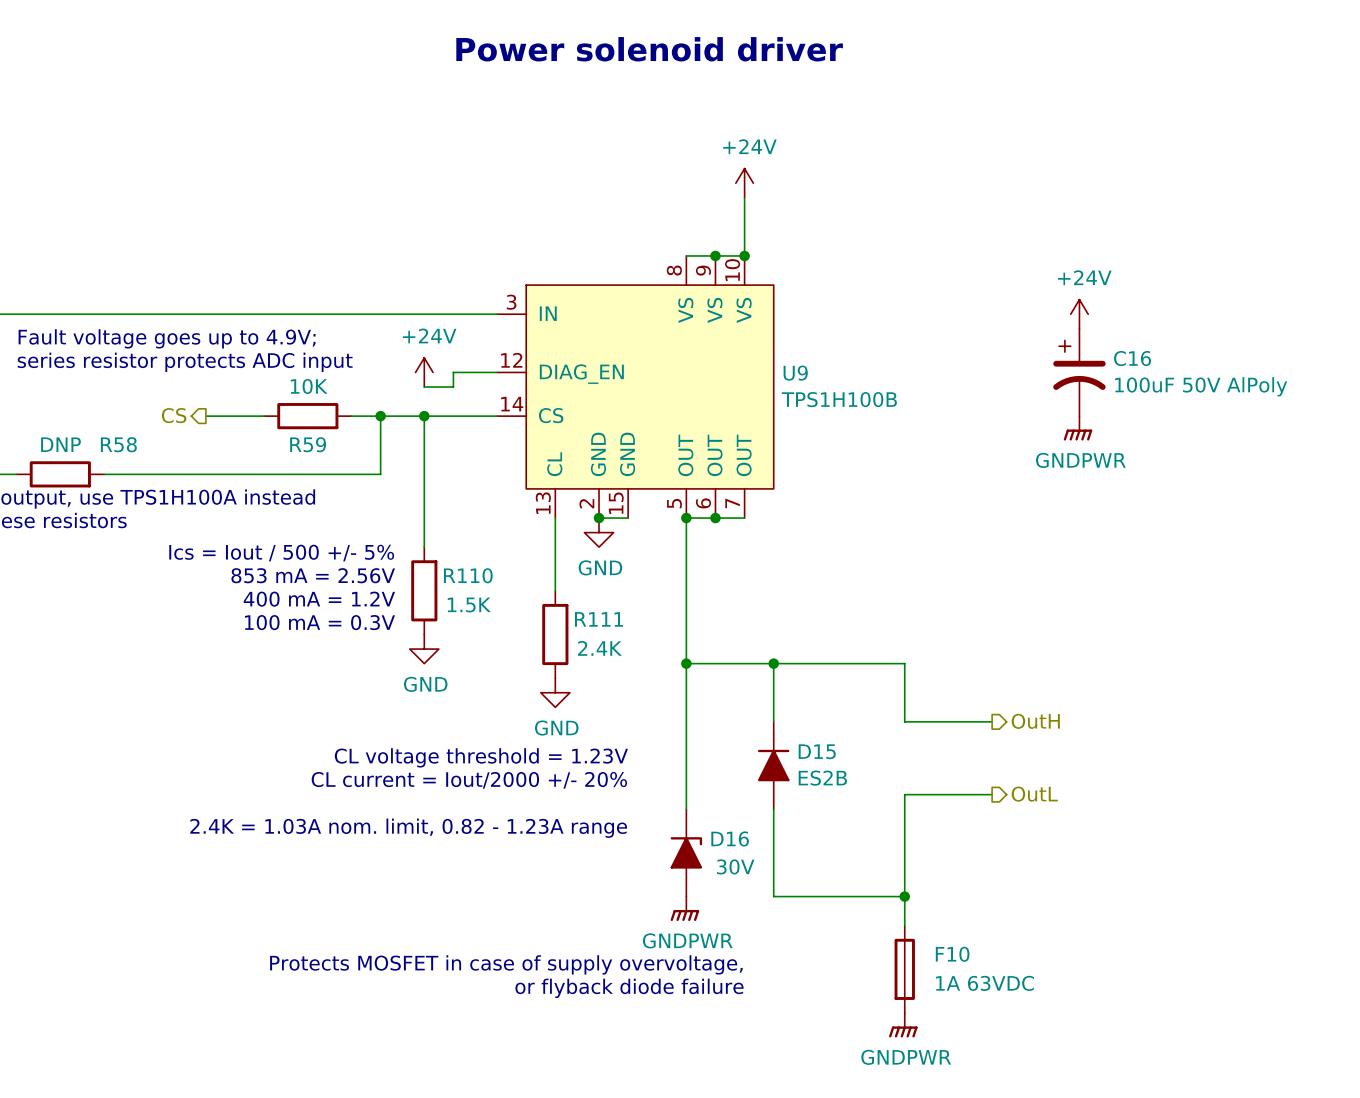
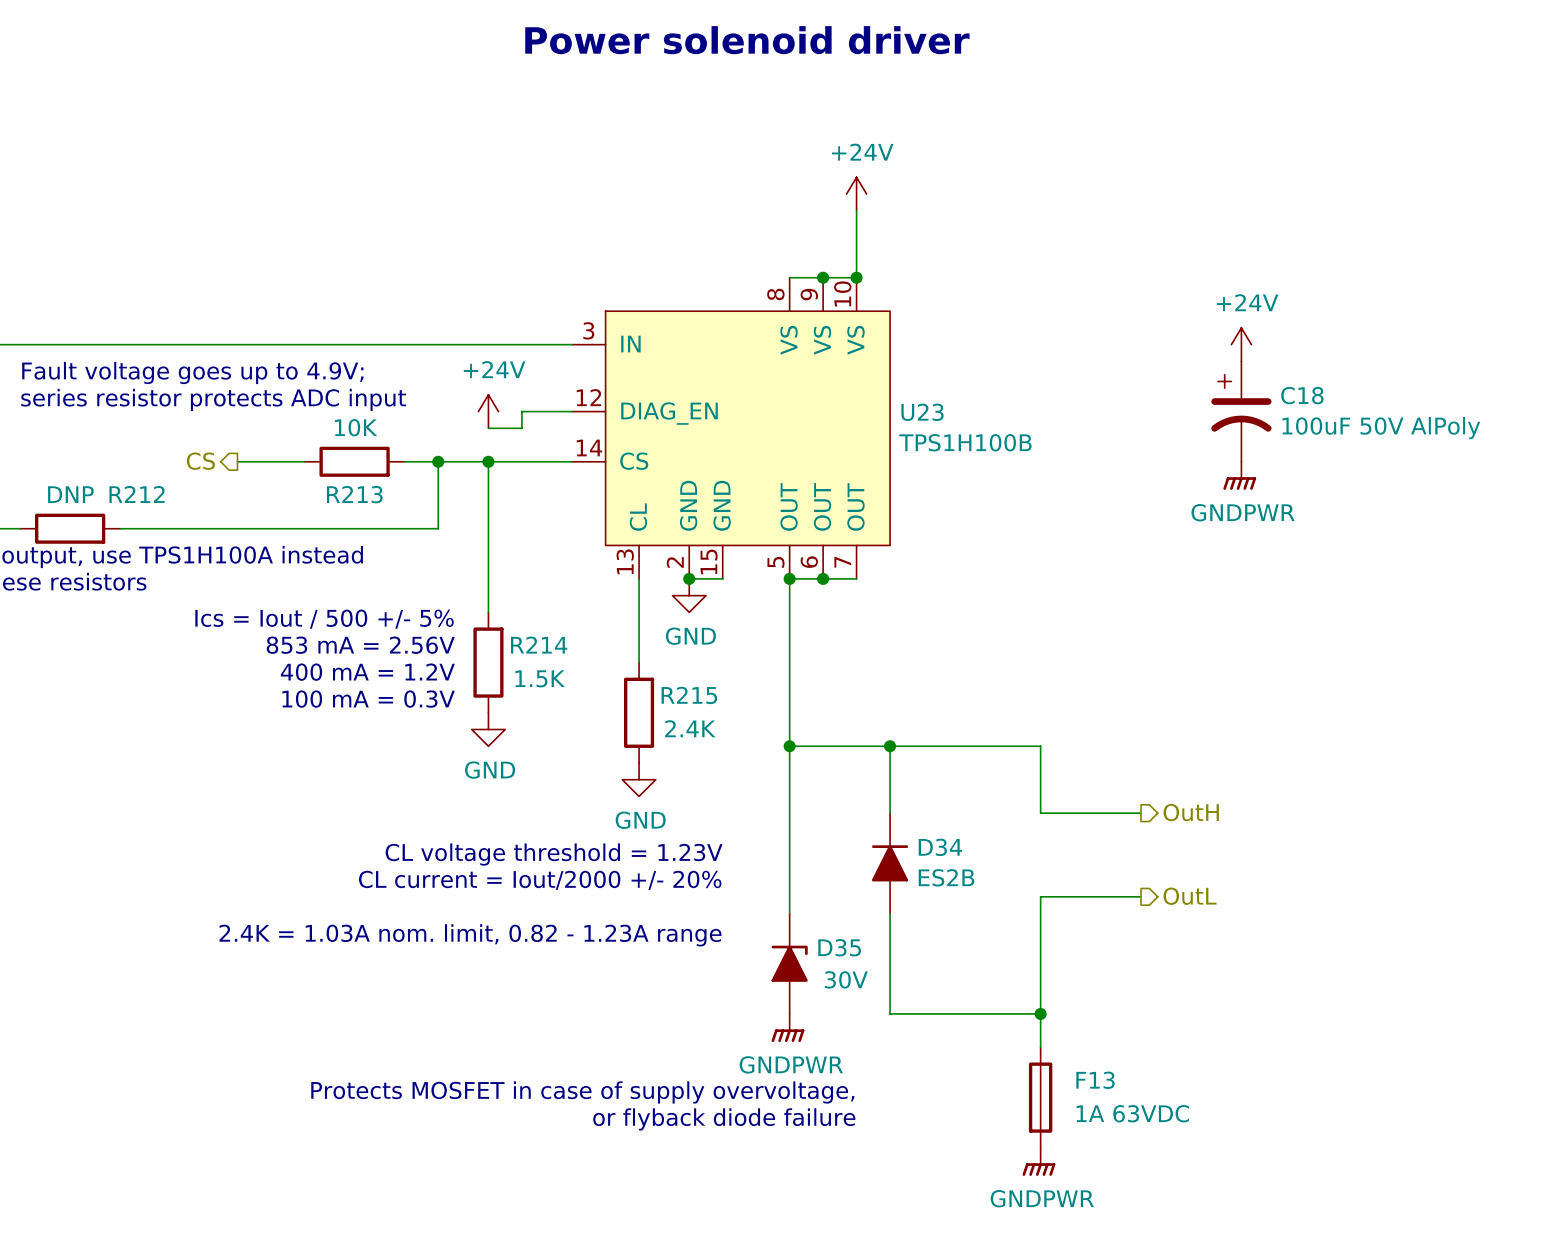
C16 name: C16 (1132, 358) -> C18 (1302, 395)
U9 name: U9 (795, 373) -> U23 (922, 412)
R58 name: R58 (118, 444) -> R212 (137, 494)
R59 name: R59 (308, 444) -> R213 (354, 494)
R110 name: R110 (468, 575) -> R214 (539, 645)
R111 name: R111 (599, 619) -> R215 (689, 695)
D15 name: D15 (817, 751) -> D34 (940, 847)
D16 name: D16 (730, 838) -> D35 (839, 947)
F10 name: F10 (952, 954) -> F13 (1095, 1080)

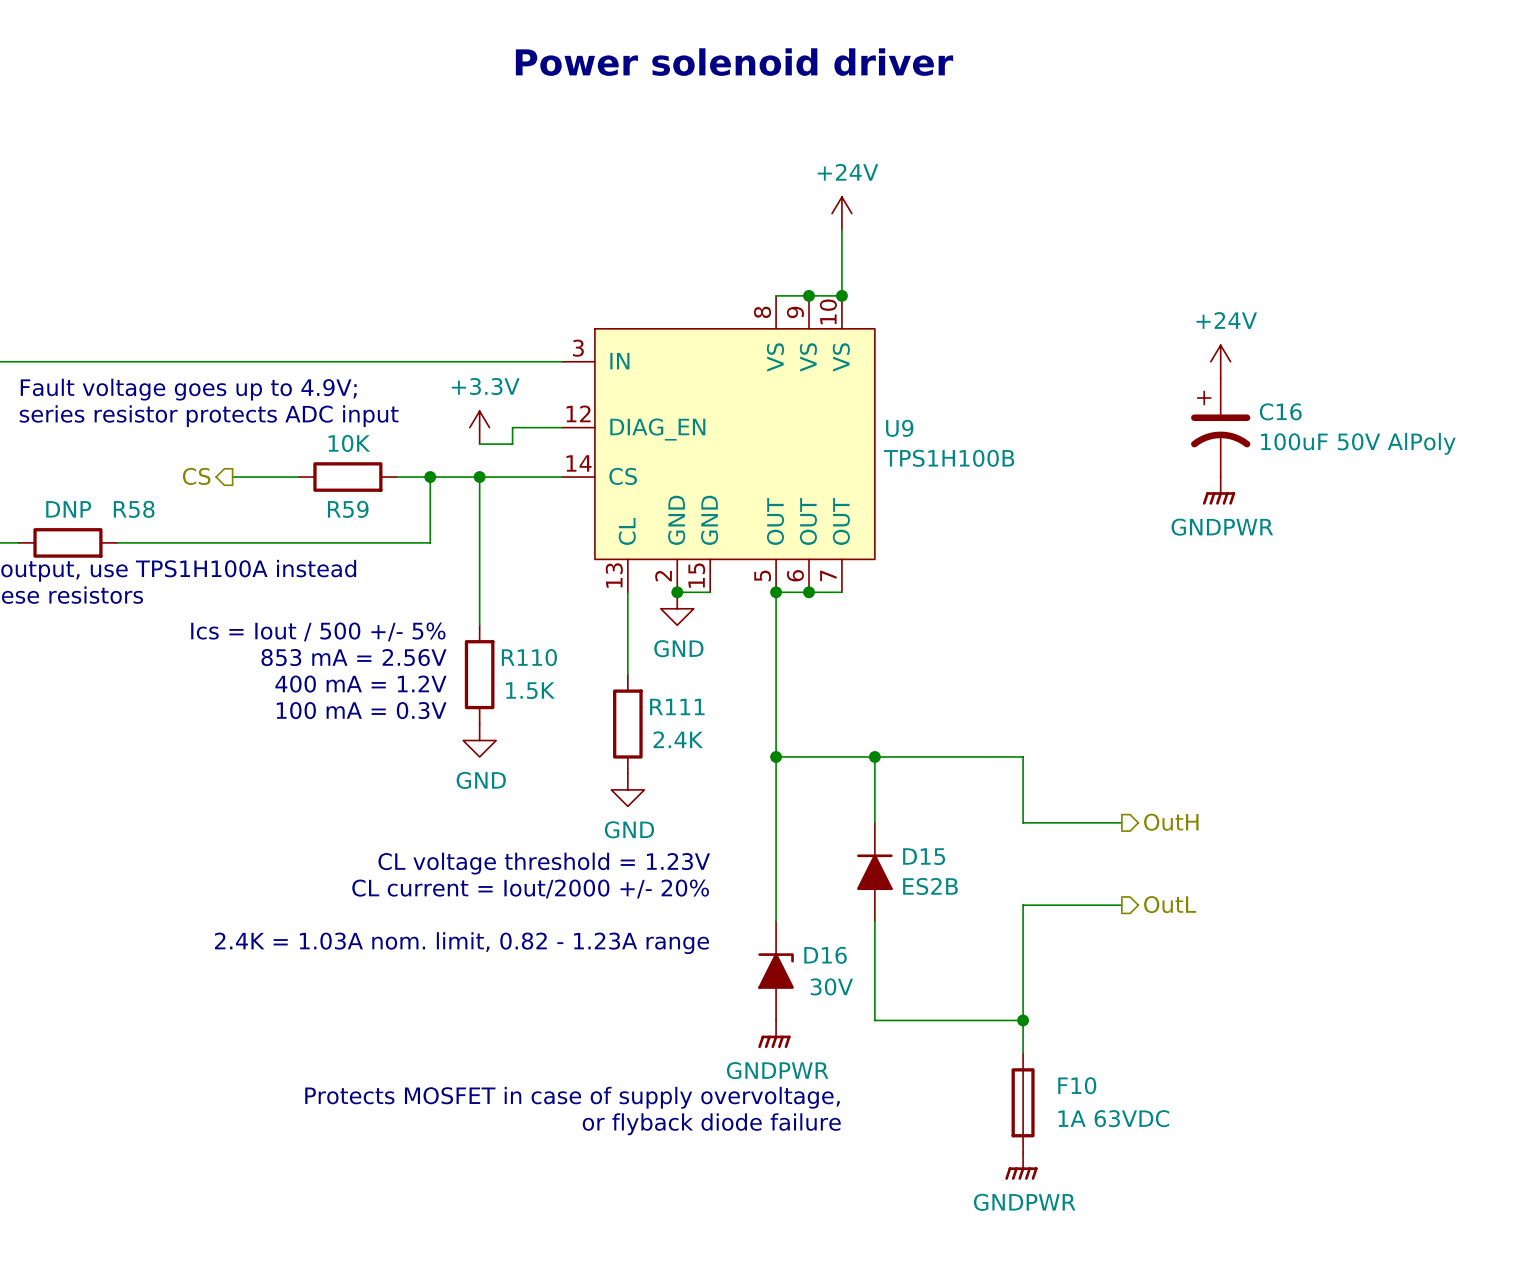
C18 name: C18 (1302, 395) -> C16 (1280, 411)
power symbol: +24V (488, 411) -> +3.3V (479, 427)
U23 name: U23 (922, 412) -> U9 (899, 428)
R212 name: R212 (137, 494) -> R58 (134, 509)
R213 name: R213 (354, 494) -> R59 (348, 509)
R214 name: R214 (539, 645) -> R110 (529, 657)
R215 name: R215 (689, 695) -> R111 (677, 706)
D34 name: D34 (940, 847) -> D15 (924, 856)
D35 name: D35 (839, 947) -> D16 (825, 955)
F13 name: F13 (1095, 1080) -> F10 (1077, 1085)

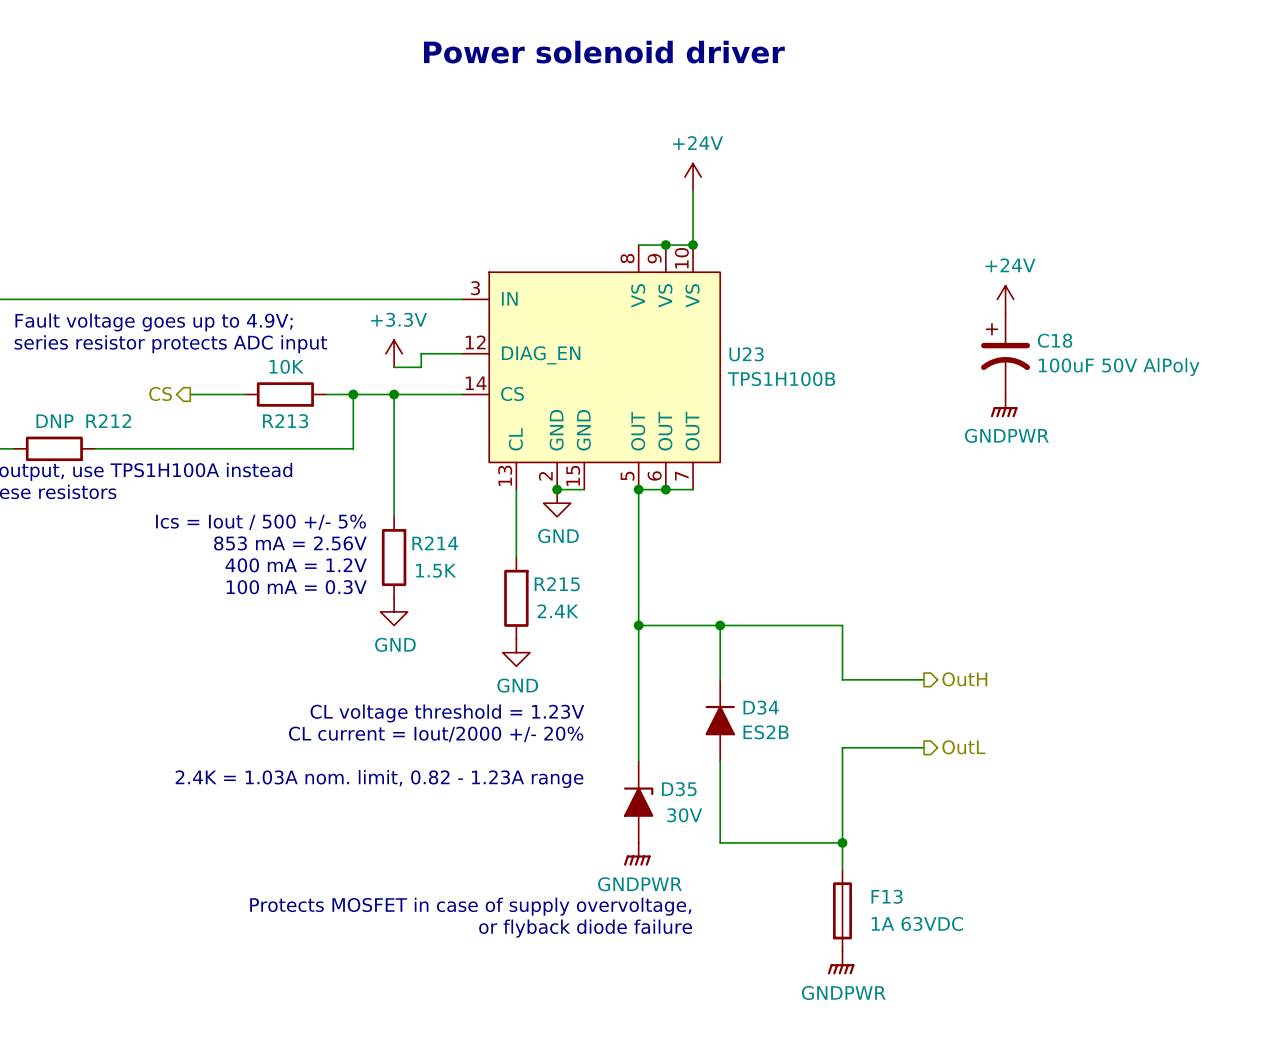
C16 name: C16 (1280, 411) -> C18 (1055, 340)
U9 name: U9 (899, 428) -> U23 (746, 354)
R58 name: R58 (134, 509) -> R212 (108, 421)
R59 name: R59 (348, 509) -> R213 (285, 421)
R110 name: R110 (529, 657) -> R214 (435, 543)
R111 name: R111 (677, 706) -> R215 (557, 584)
D15 name: D15 (924, 856) -> D34 (761, 707)
D16 name: D16 (825, 955) -> D35 (679, 789)
F10 name: F10 (1077, 1085) -> F13 (887, 896)

